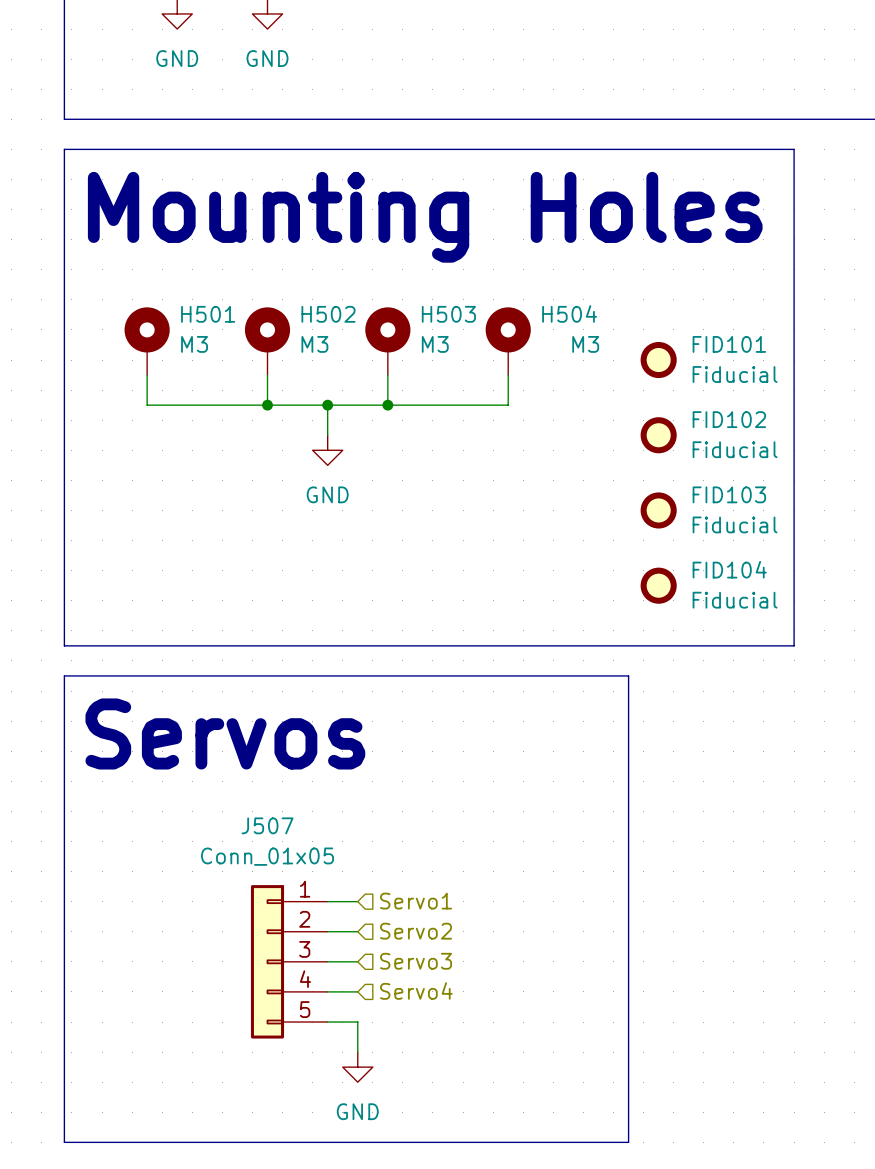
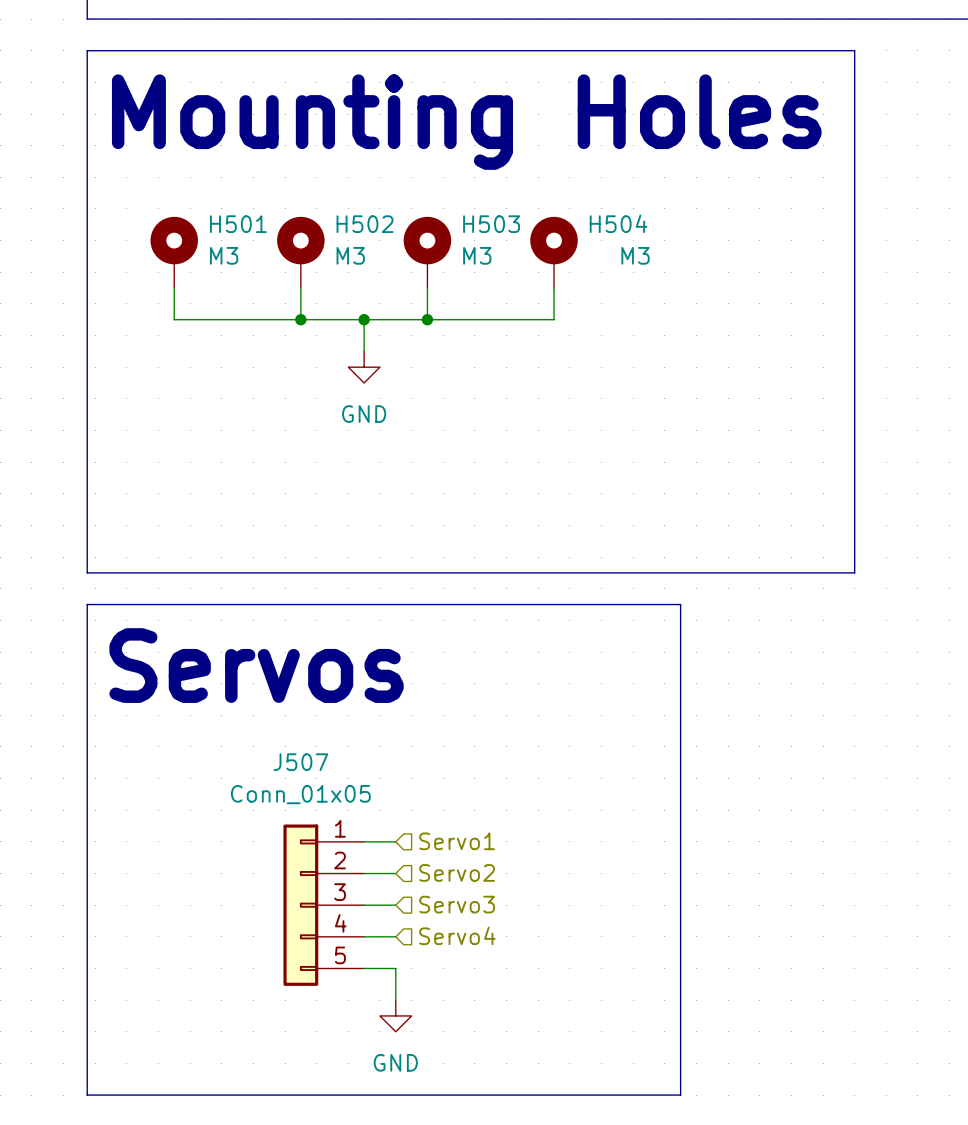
FID101: Fiducial (658, 360) -> none
FID102: Fiducial (658, 435) -> none
FID103: Fiducial (658, 510) -> none
FID104: Fiducial (658, 585) -> none

